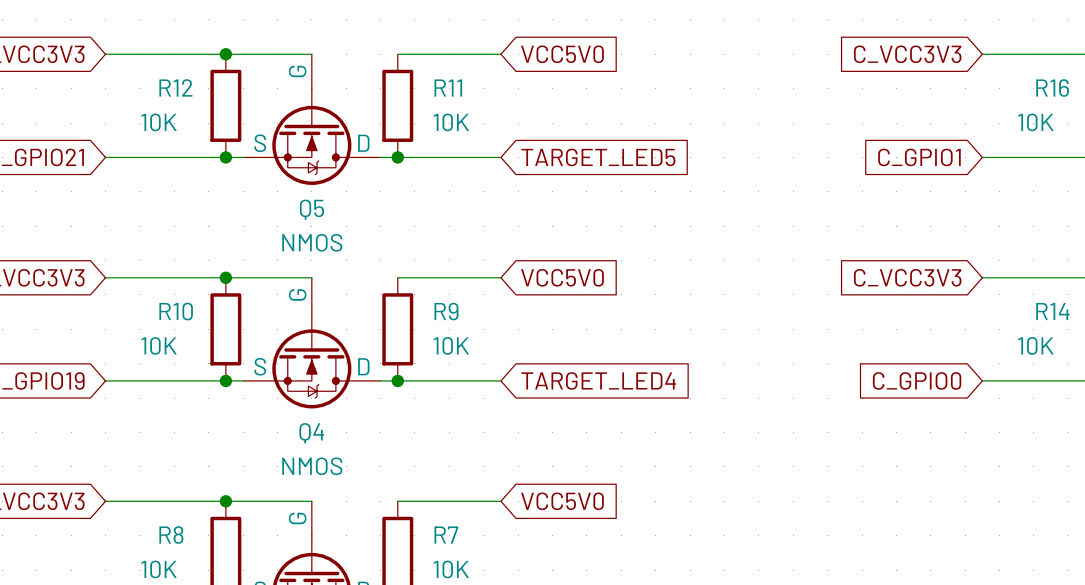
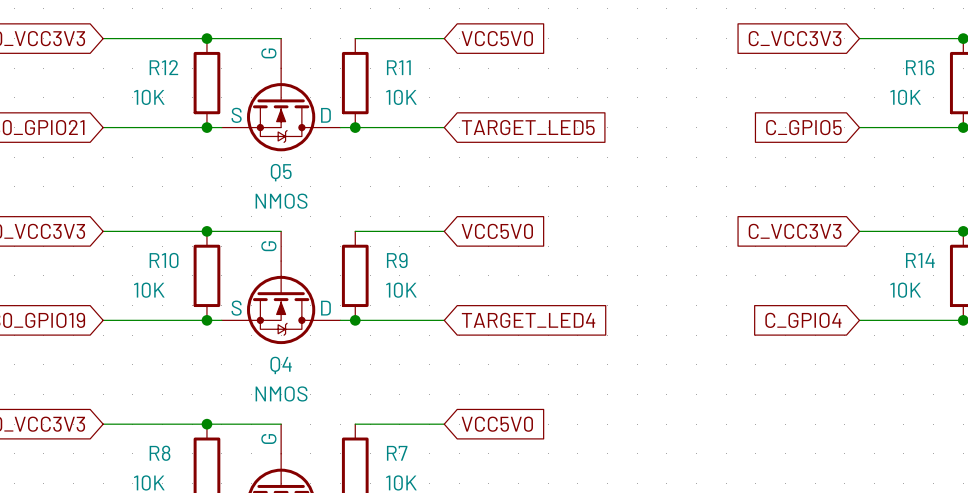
global label: C_GPIO1 (919, 157) -> C_GPIO5 (803, 127)
global label: C_GPIO0 (917, 380) -> C_GPIO4 (803, 320)

